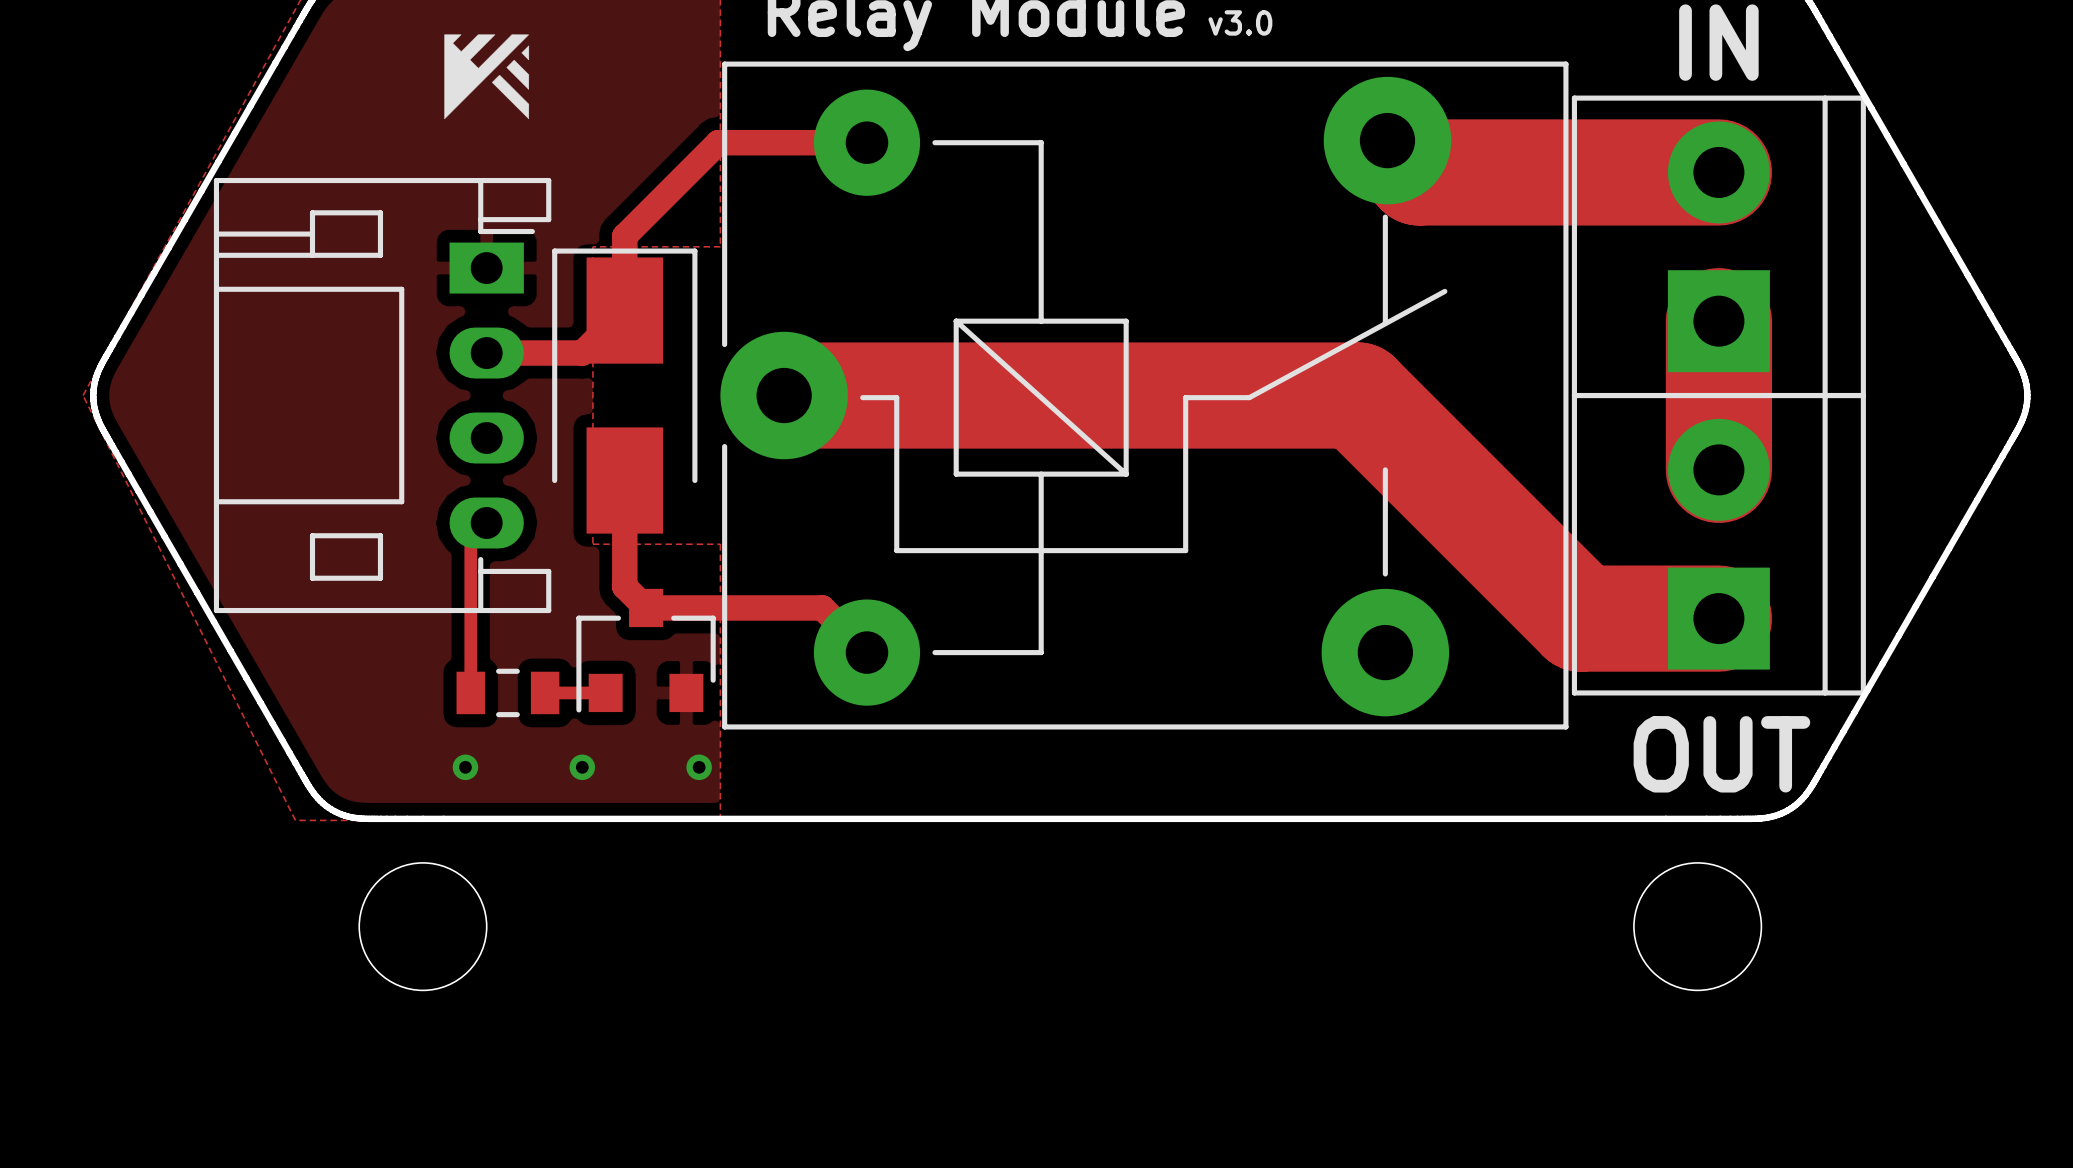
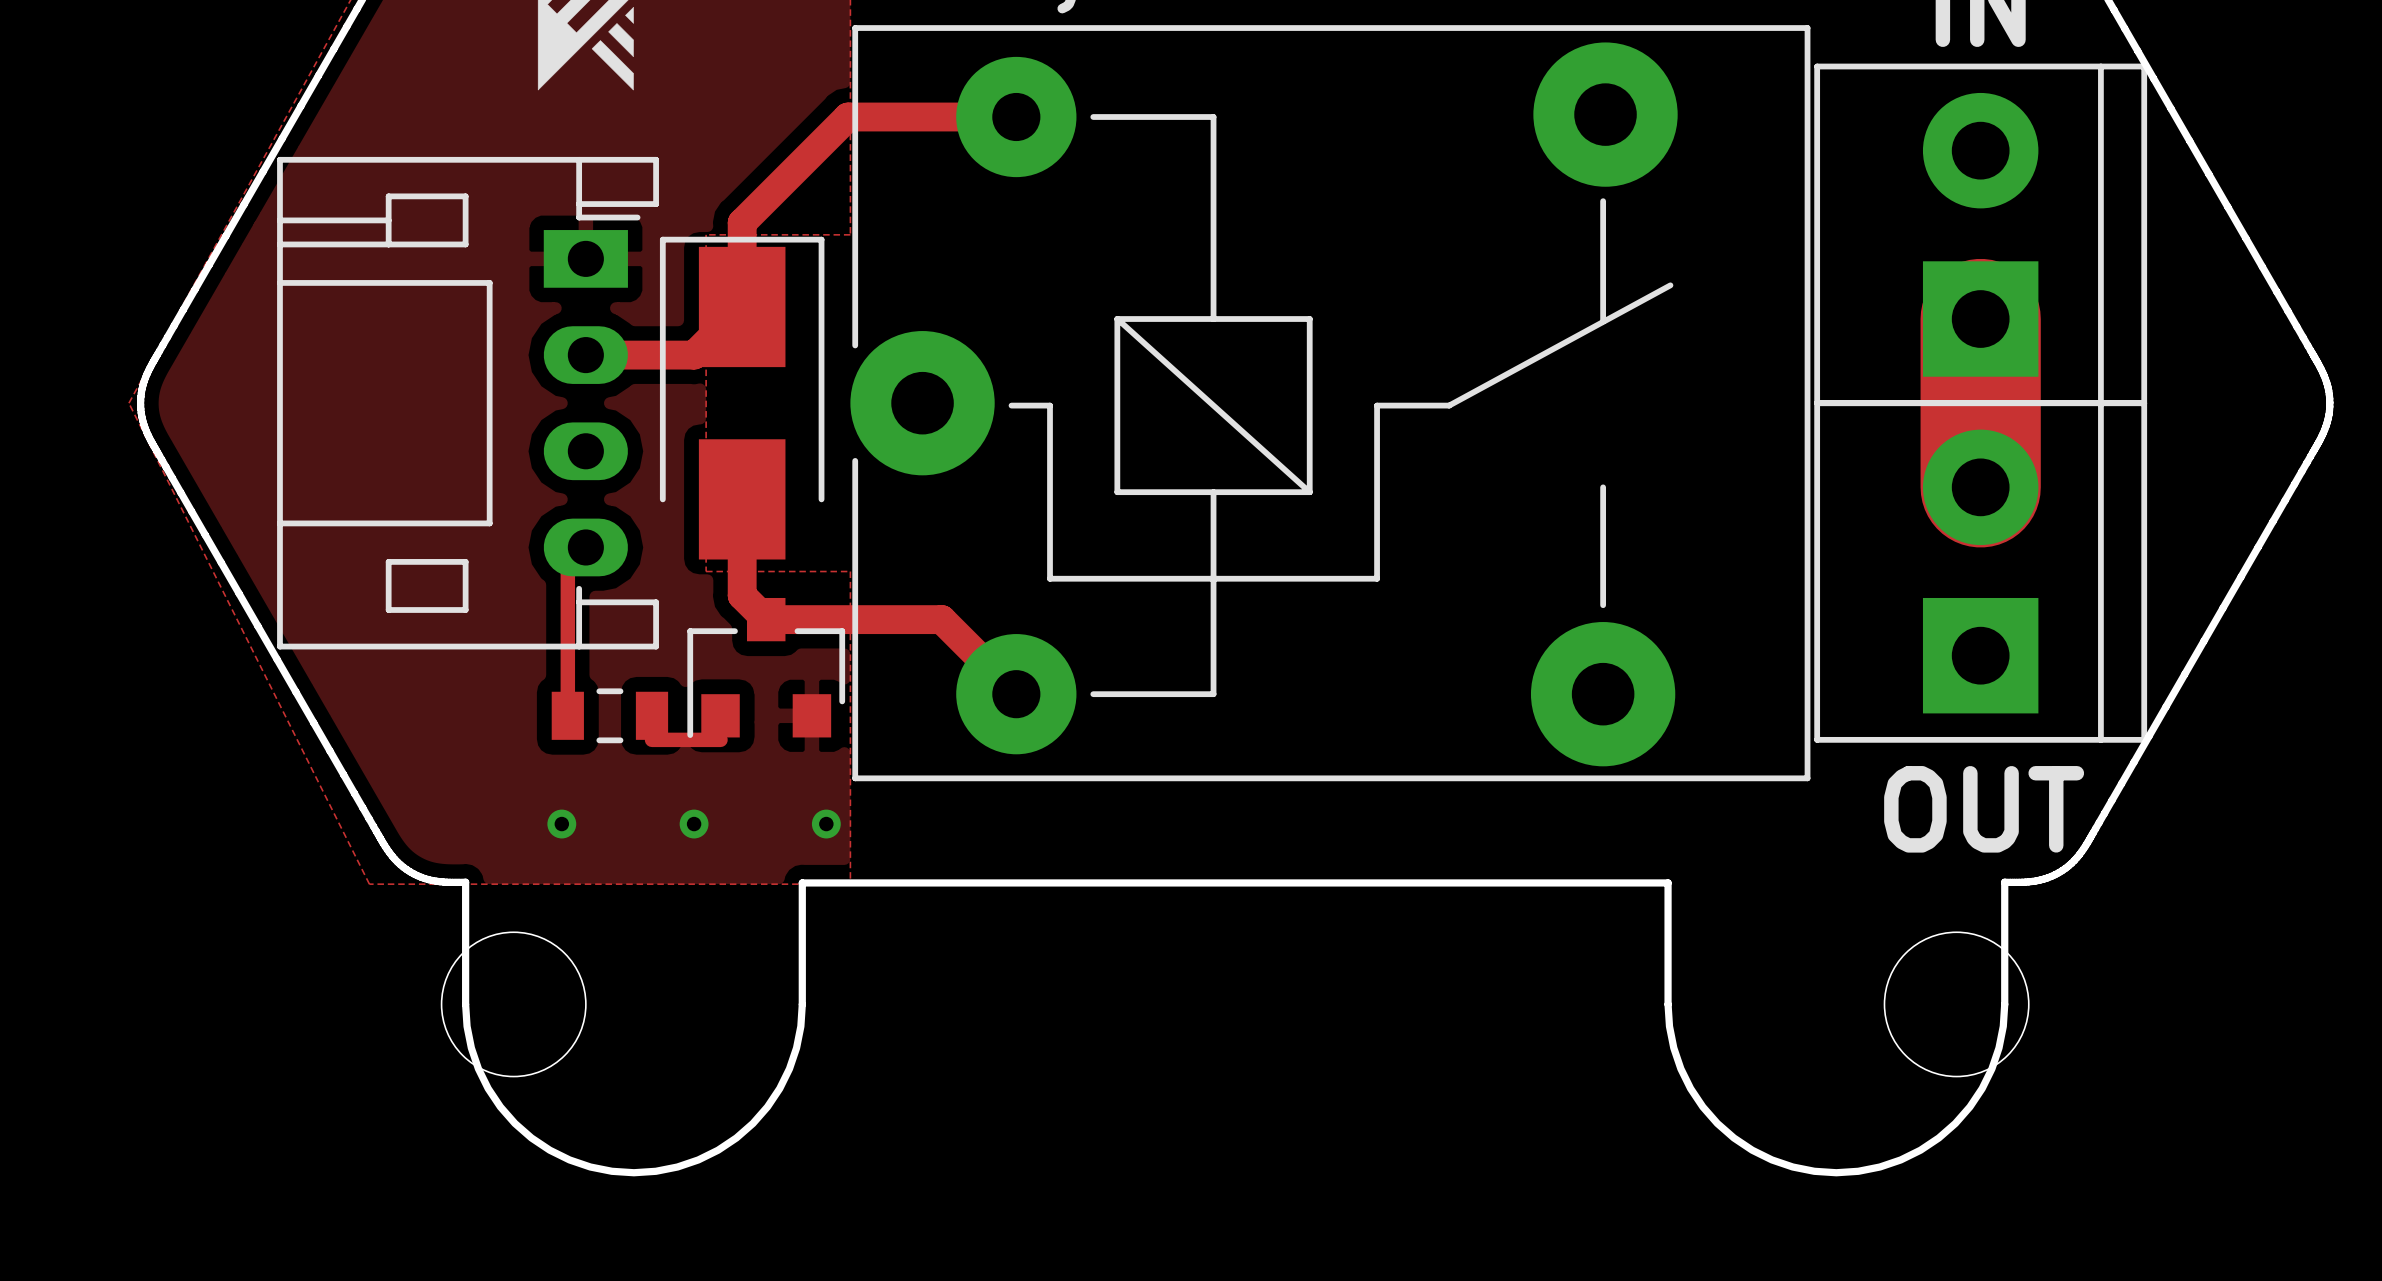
track: (1387, 140) (1419, 172) (1718, 172) -> none
track: (784, 395) (1357, 395) (1580, 618) (1718, 618) -> none
track: (624, 565) (624, 586) (646, 607) (822, 607) -> (742, 595) (766, 619) (941, 619) (965, 643)
part position: (646, 650) -> (766, 667)
part position: (507, 692) -> (609, 715)
board edge: (374, 818) (1745, 818) -> (458, 882) (465, 882) (467, 1026) (478, 1068) (500, 1106) (531, 1137) (549, 1150) (590, 1167) (633, 1172) (677, 1167) (718, 1150) (736, 1137) (767, 1106) (789, 1068) (800, 1026) (802, 882) (1668, 882) (1669, 1026) (1673, 1047) (1690, 1088) (1717, 1123) (1752, 1150) (1792, 1167) (1836, 1172) (1879, 1167) (1920, 1150) (1955, 1123) (1982, 1088) (1998, 1047) (2003, 1026) (2004, 882) (2010, 882)

